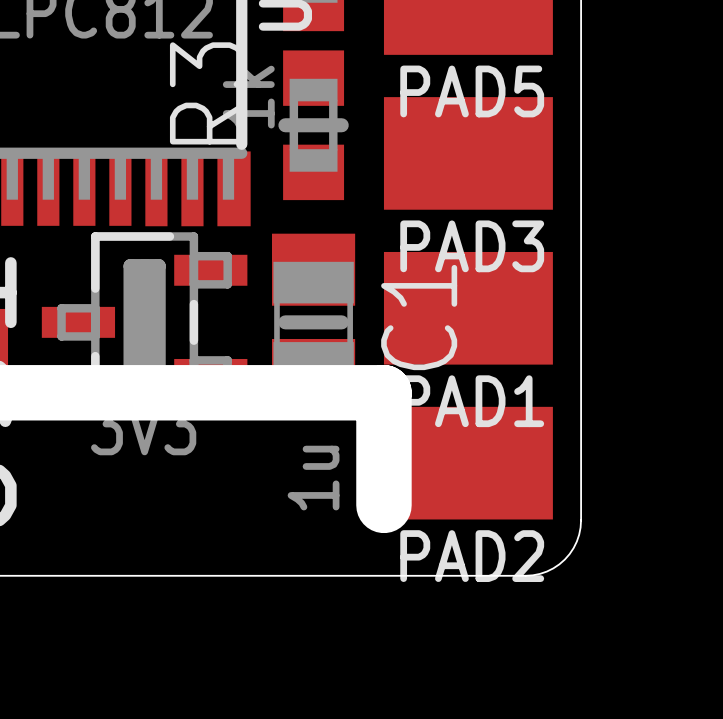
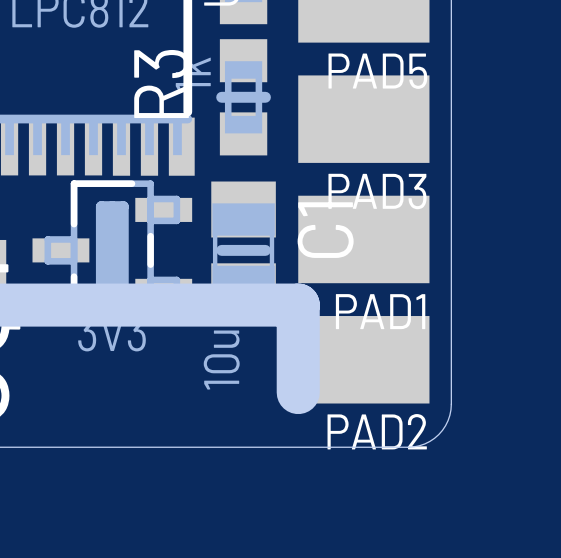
C1 value: 1u (313, 478) -> 10u (221, 360)

